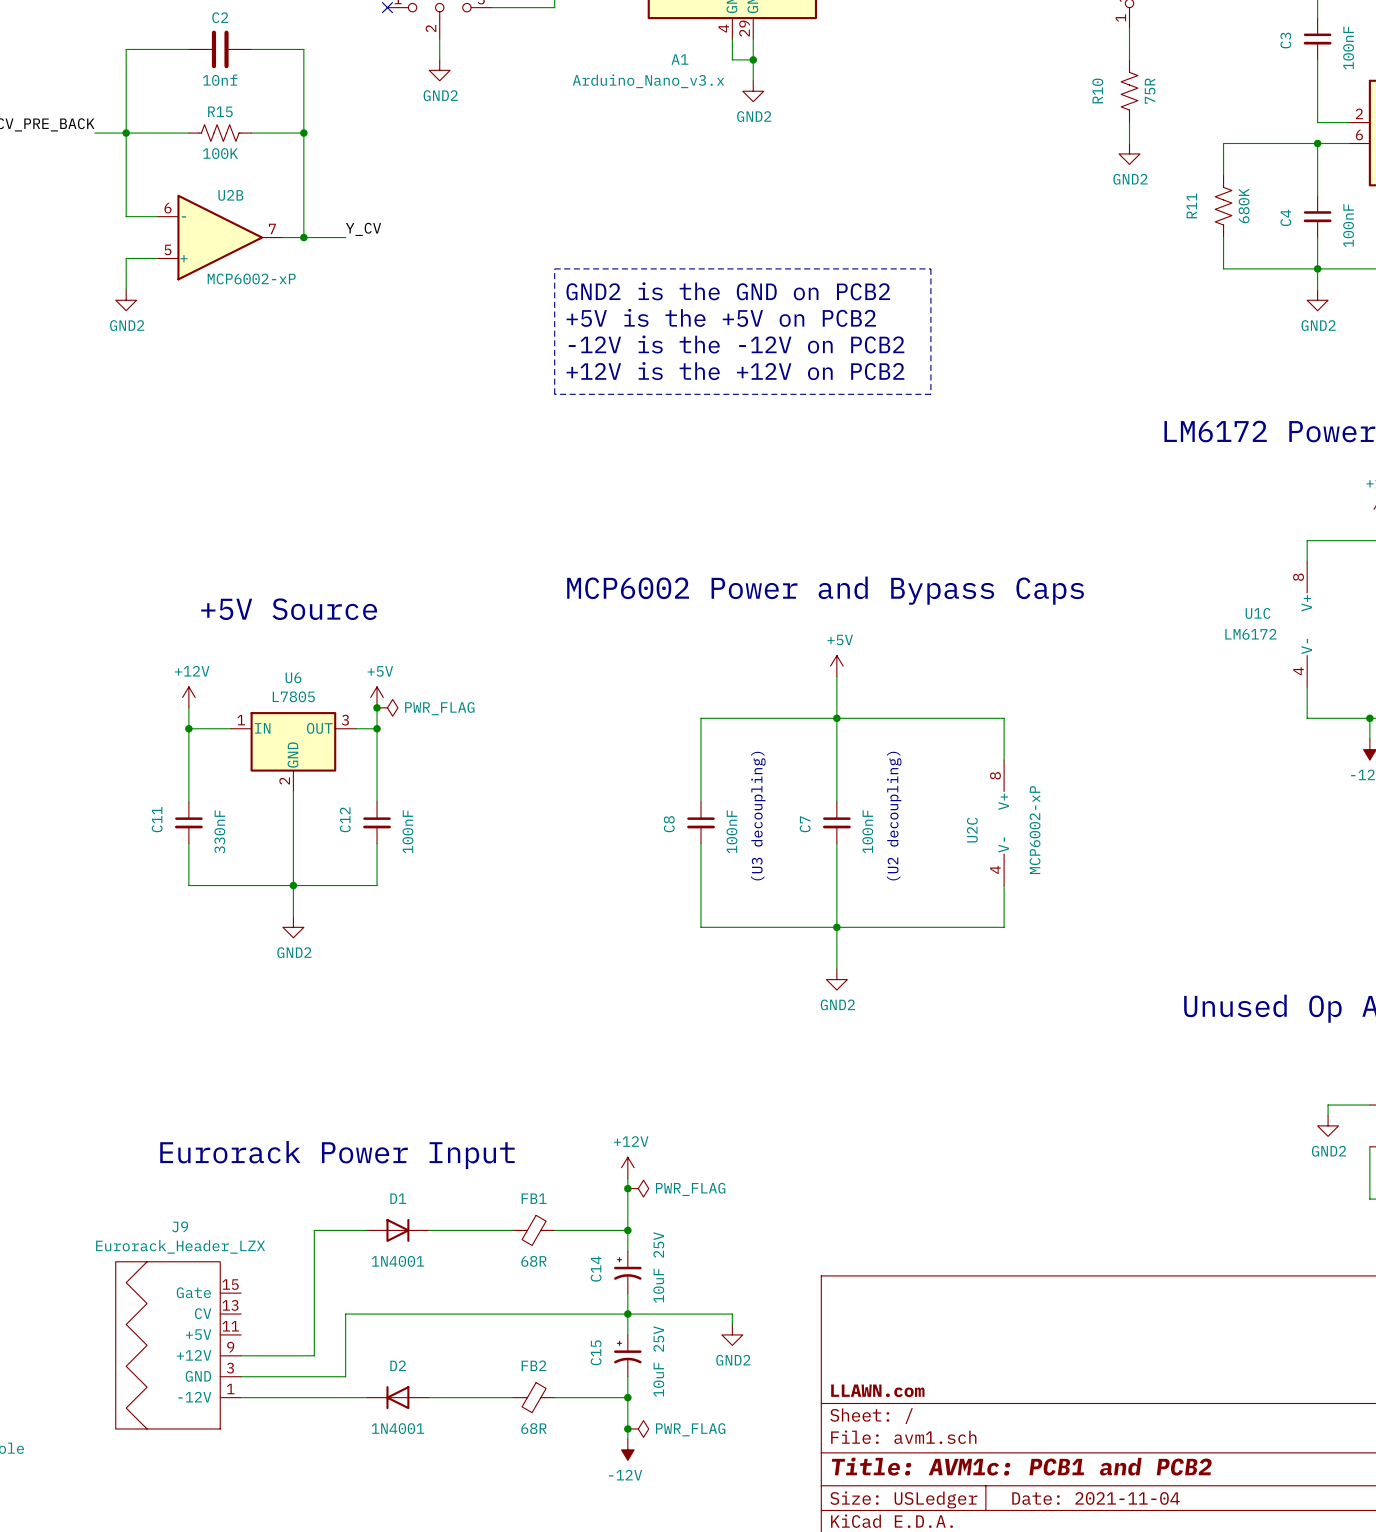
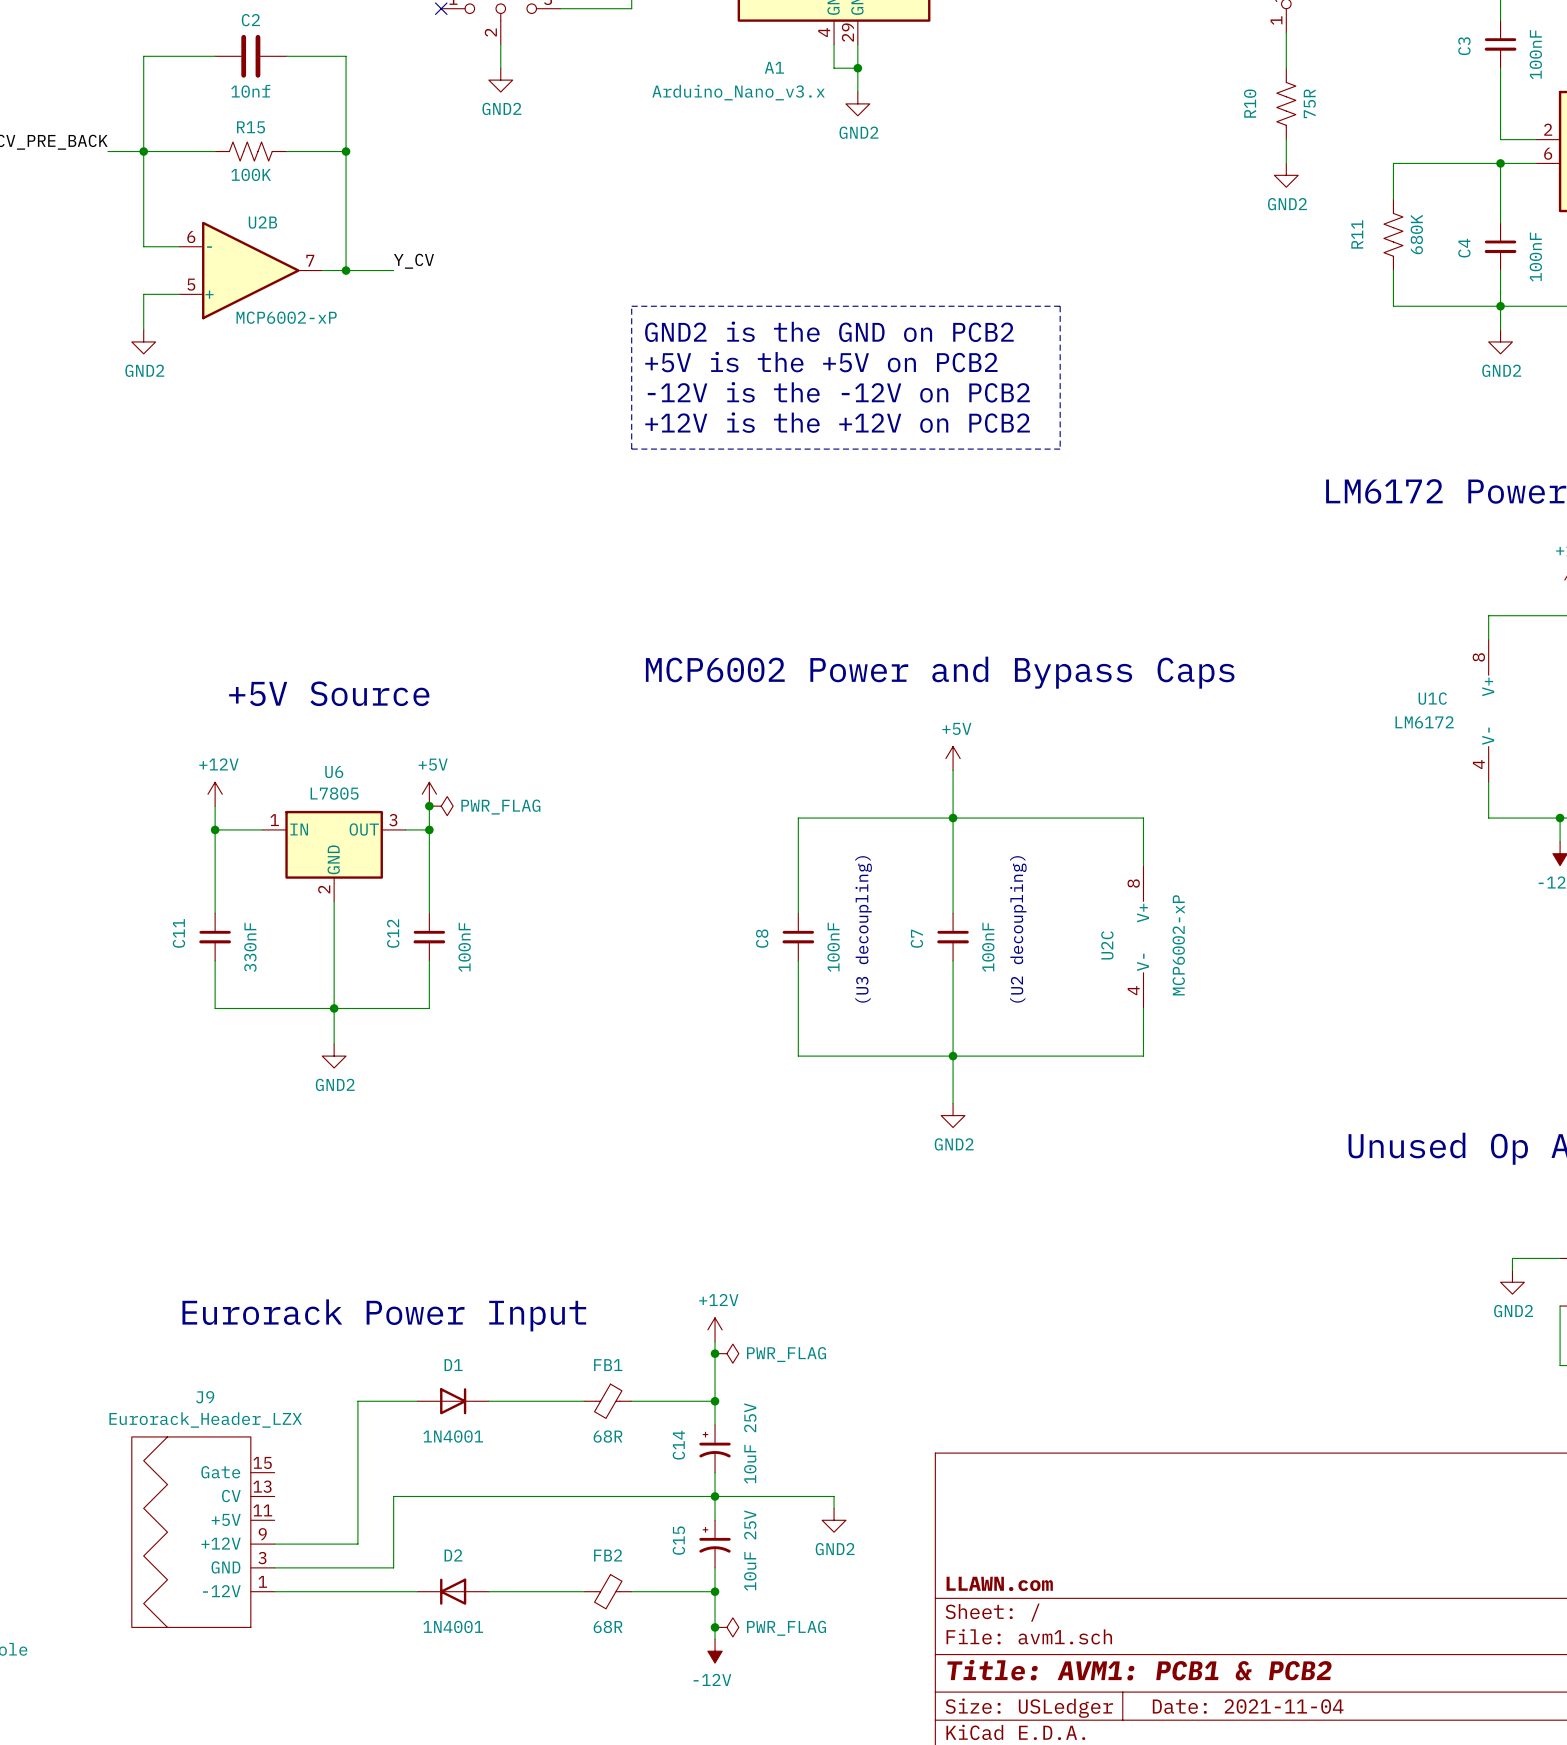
title block: Title: AVM1c: PCB1 and PCB2 (1021, 1466) -> Title: AVM1: PCB1 & PCB2 (1139, 1670)

